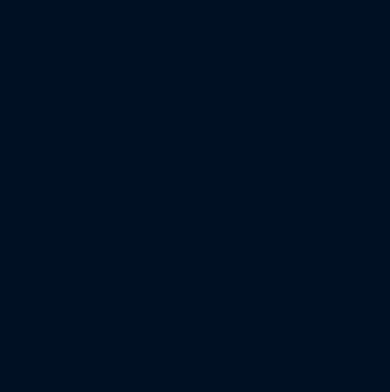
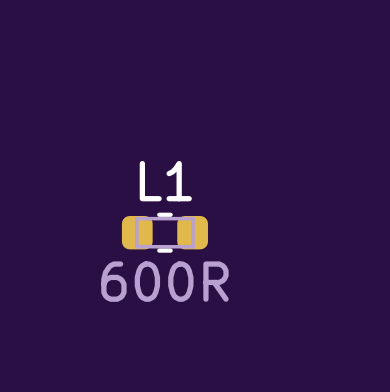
L1: none -> 600R (164, 232)

